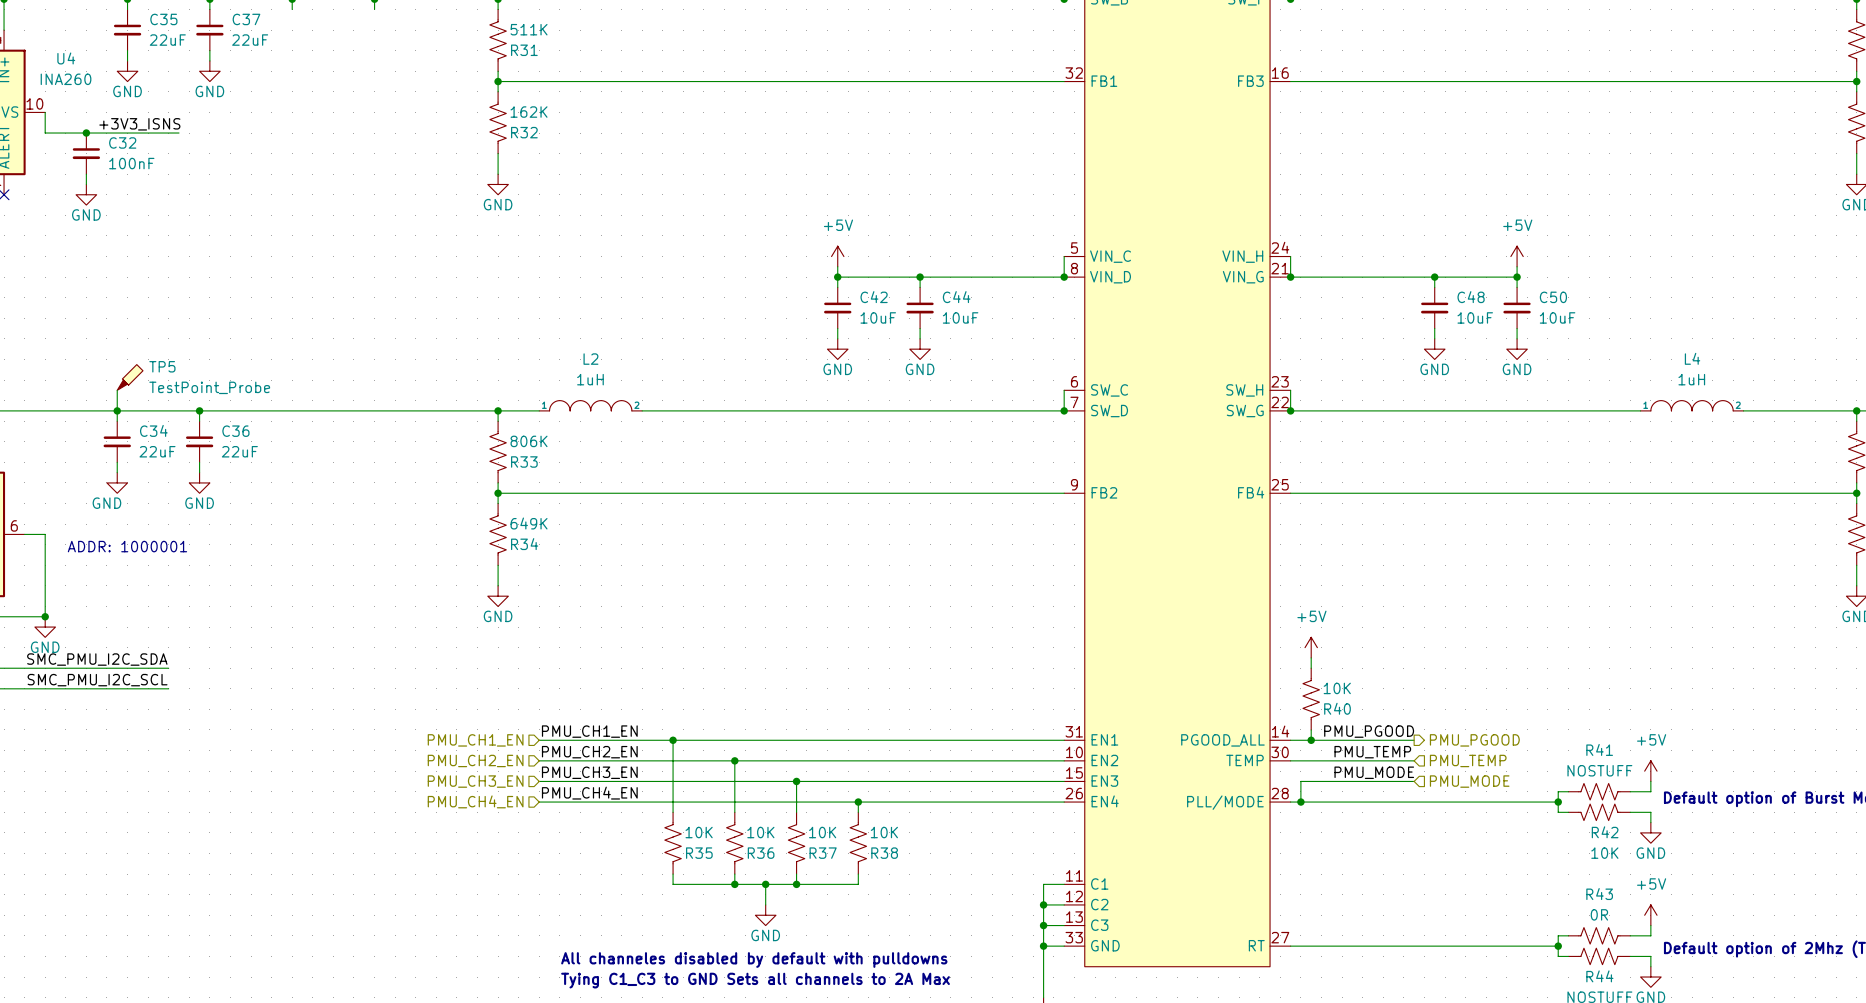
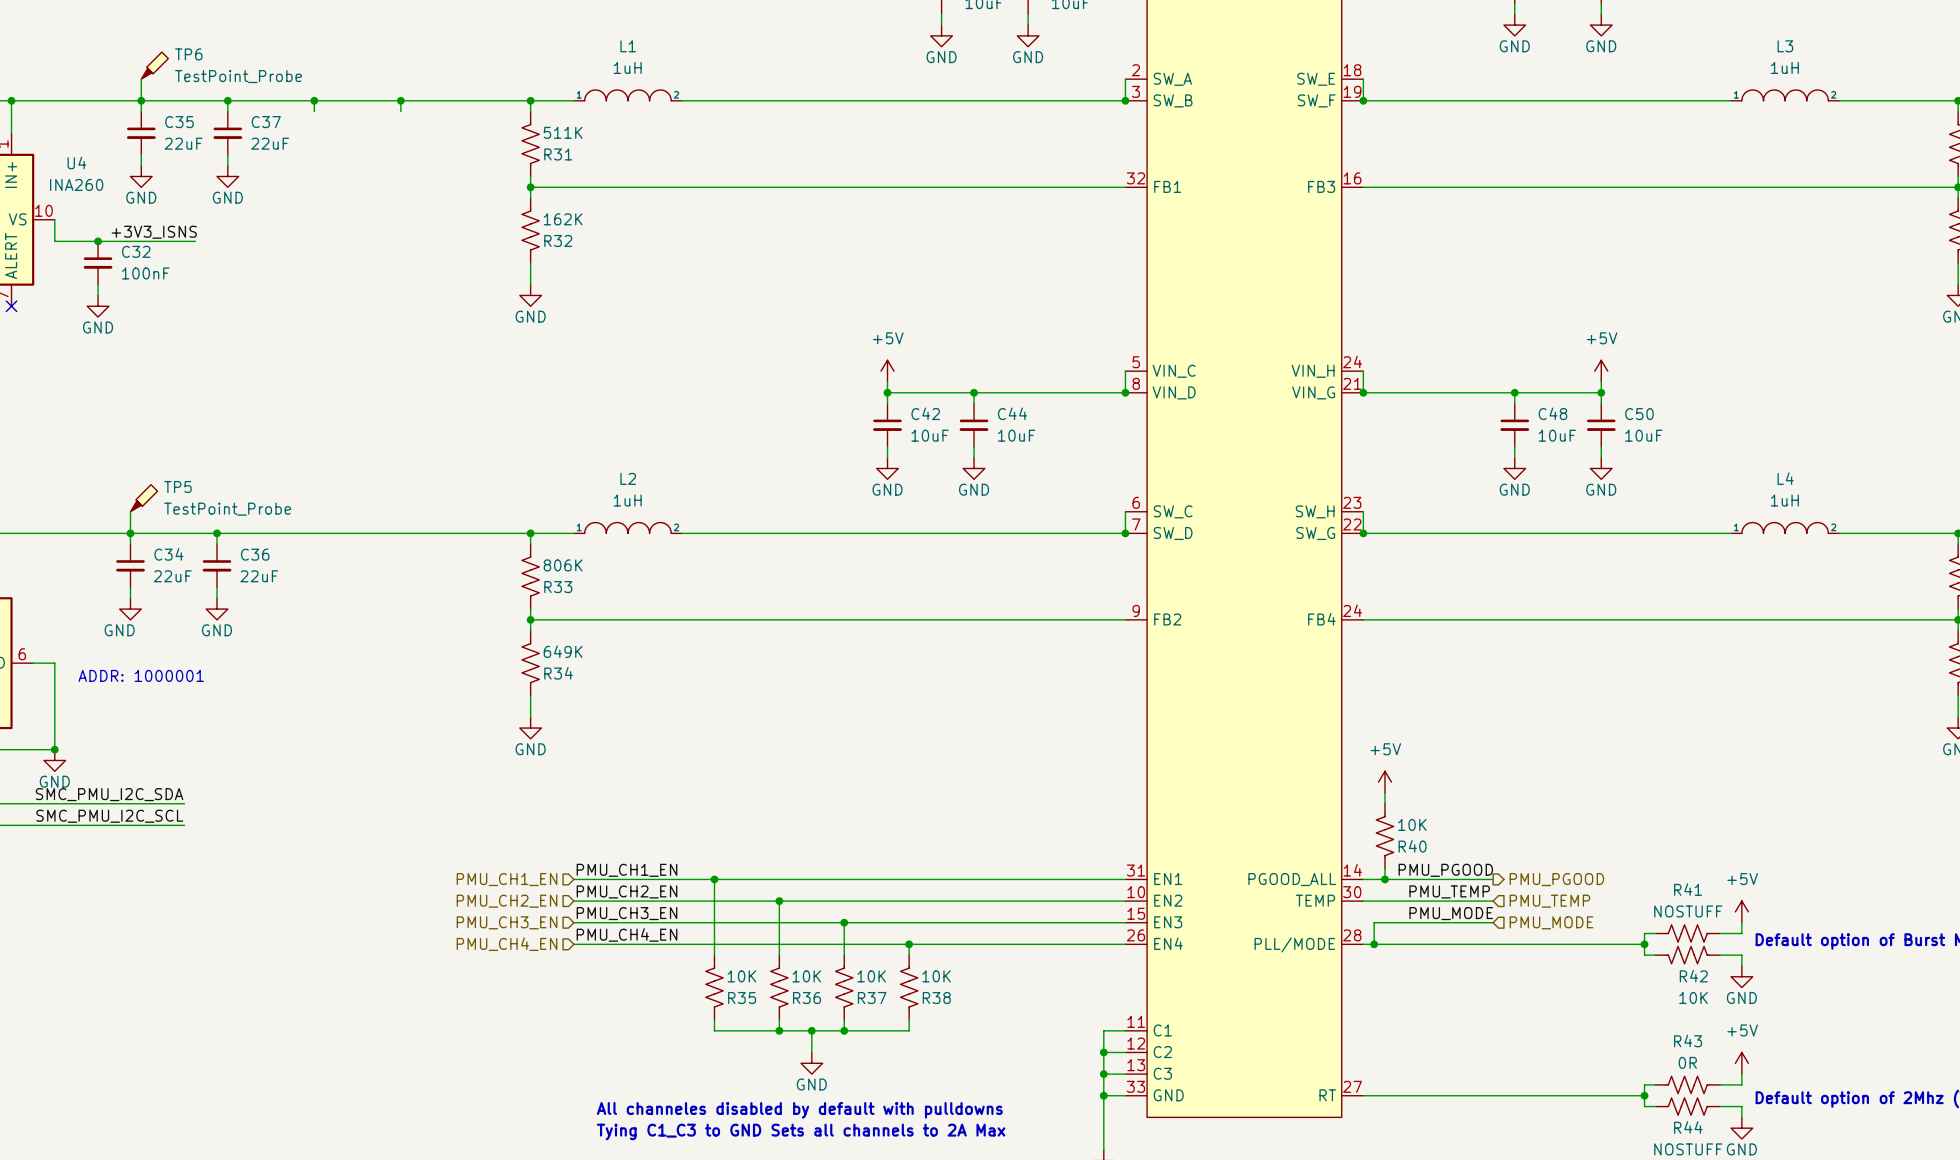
part pin number: 25 (1280, 484) -> 24 (1352, 610)

